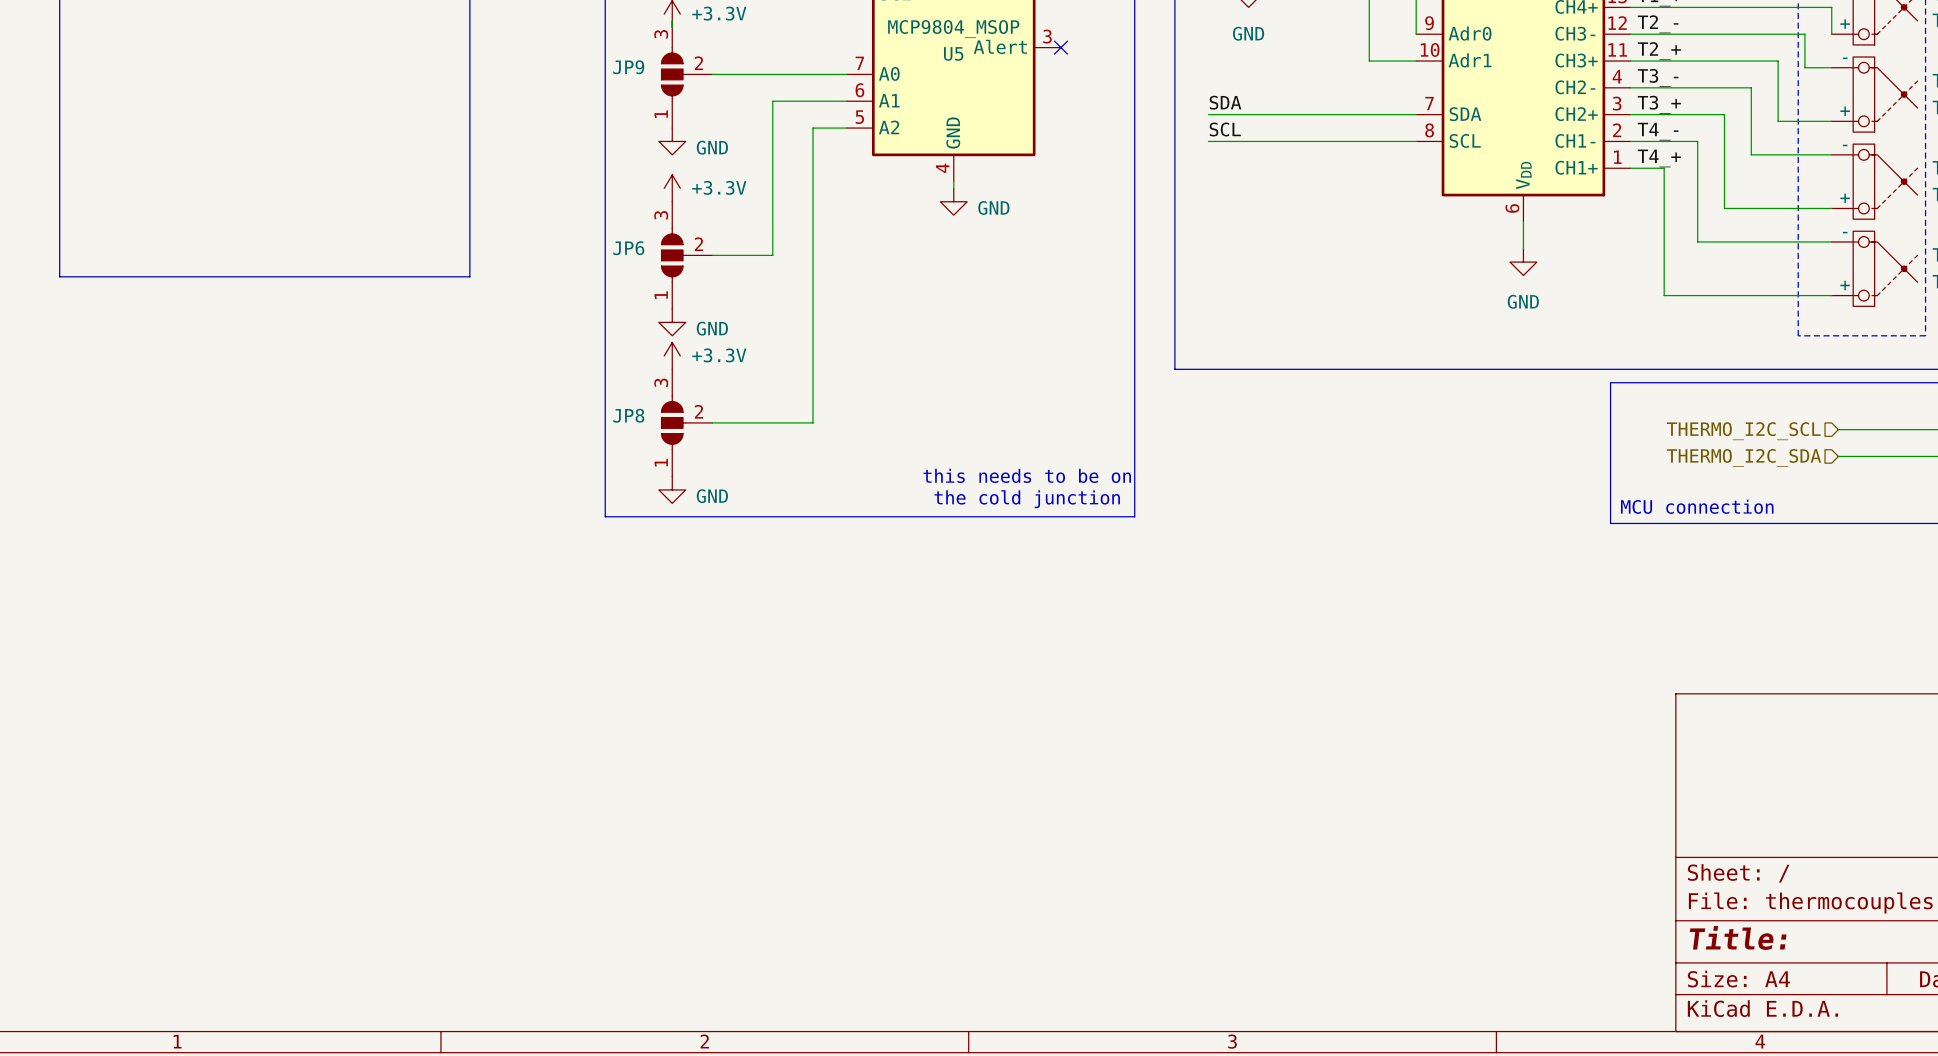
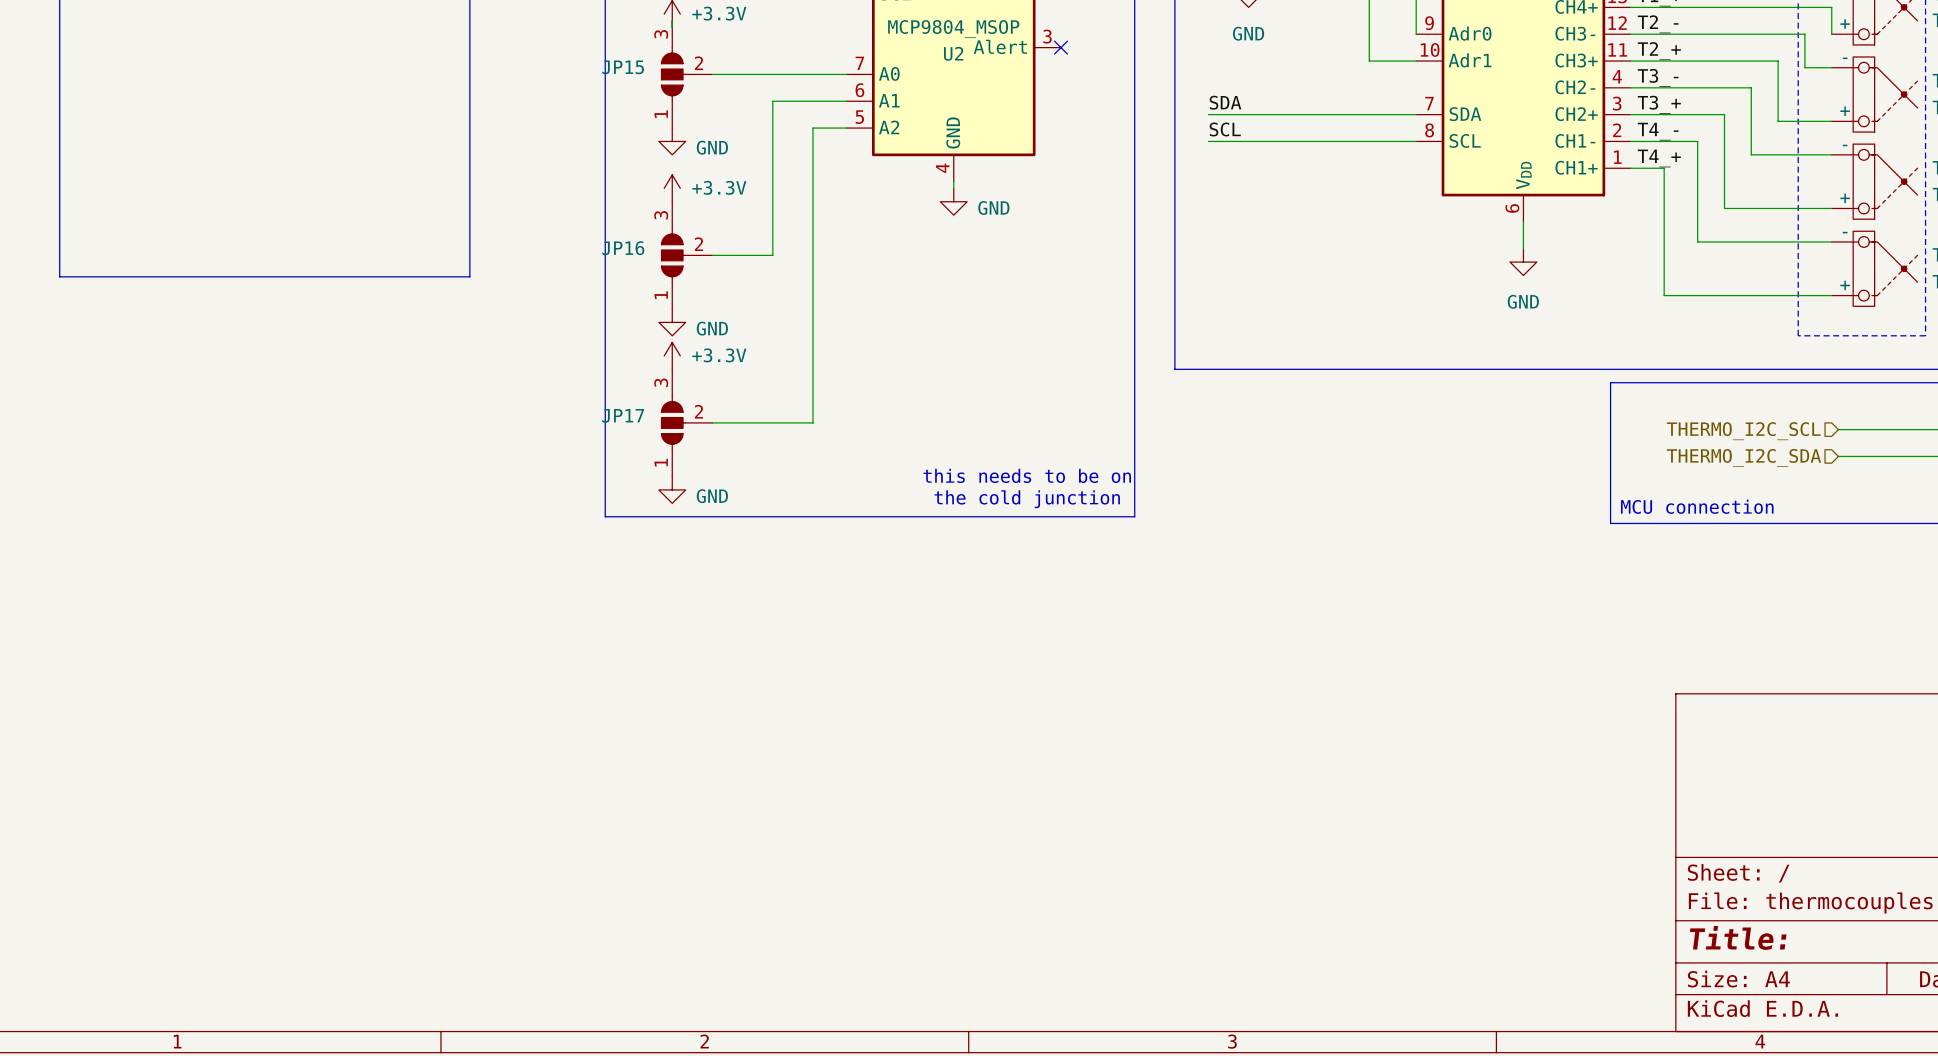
U5 name: U5 (953, 53) -> U2 (953, 53)
JP9 name: JP9 (628, 67) -> JP15 (623, 67)
JP6 name: JP6 (628, 248) -> JP16 (623, 248)
JP8 name: JP8 (628, 415) -> JP17 (623, 415)

